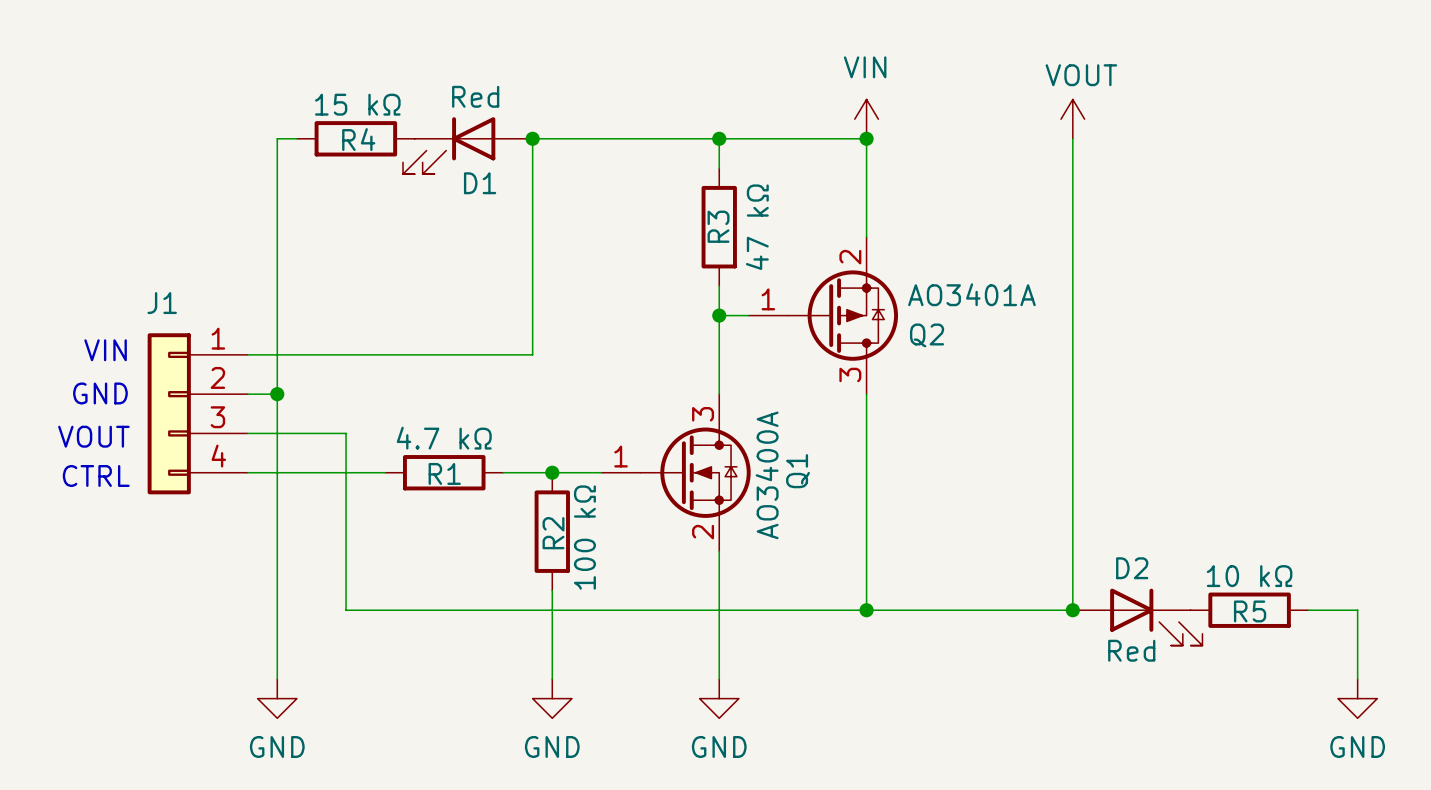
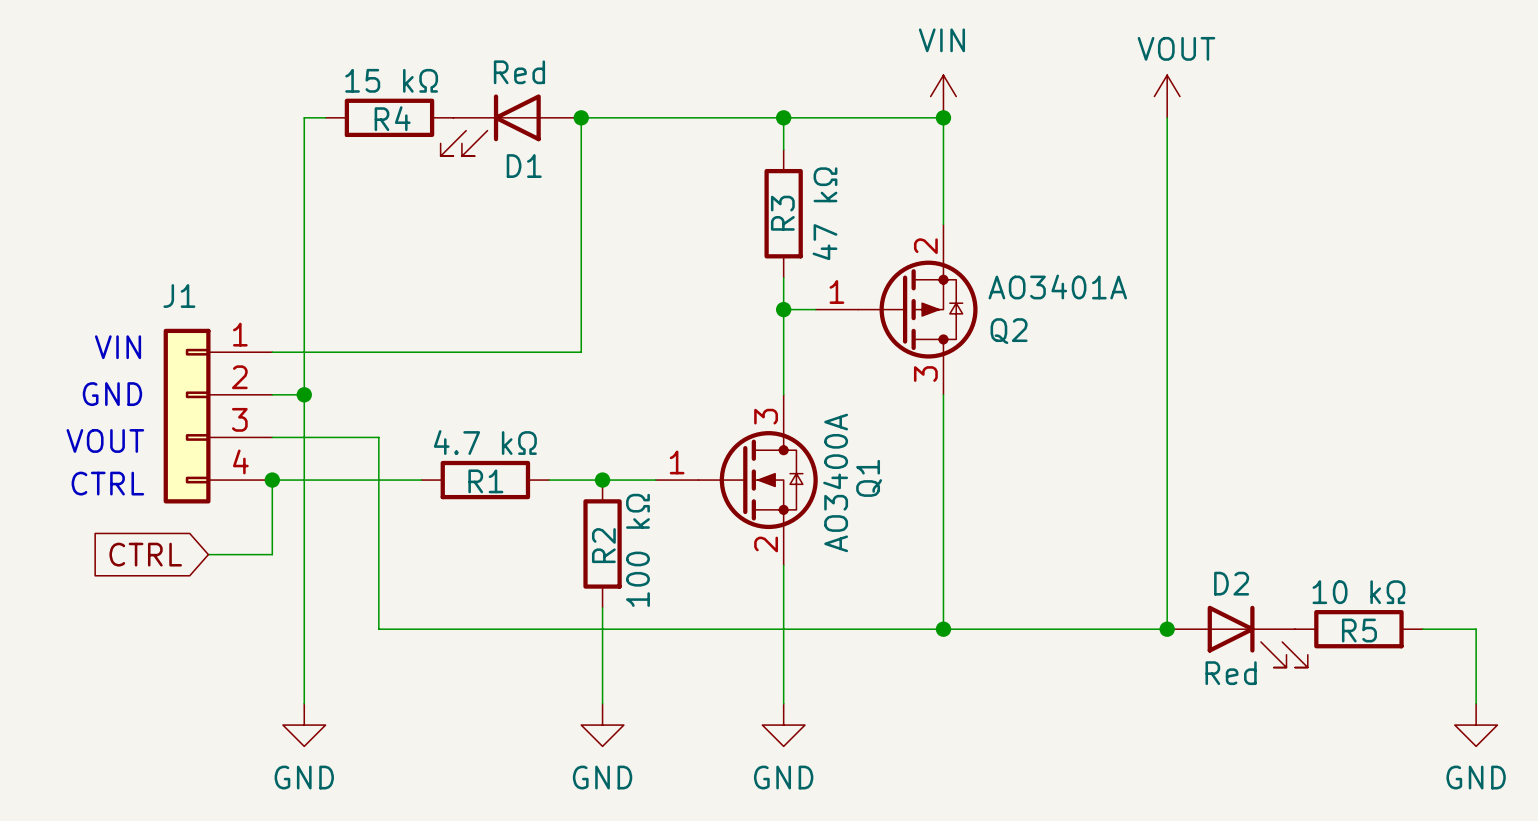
wire: none -> (272, 480) (272, 554) (208, 554)
junction: none -> (272, 480)
global label: none -> CTRL (145, 554)

